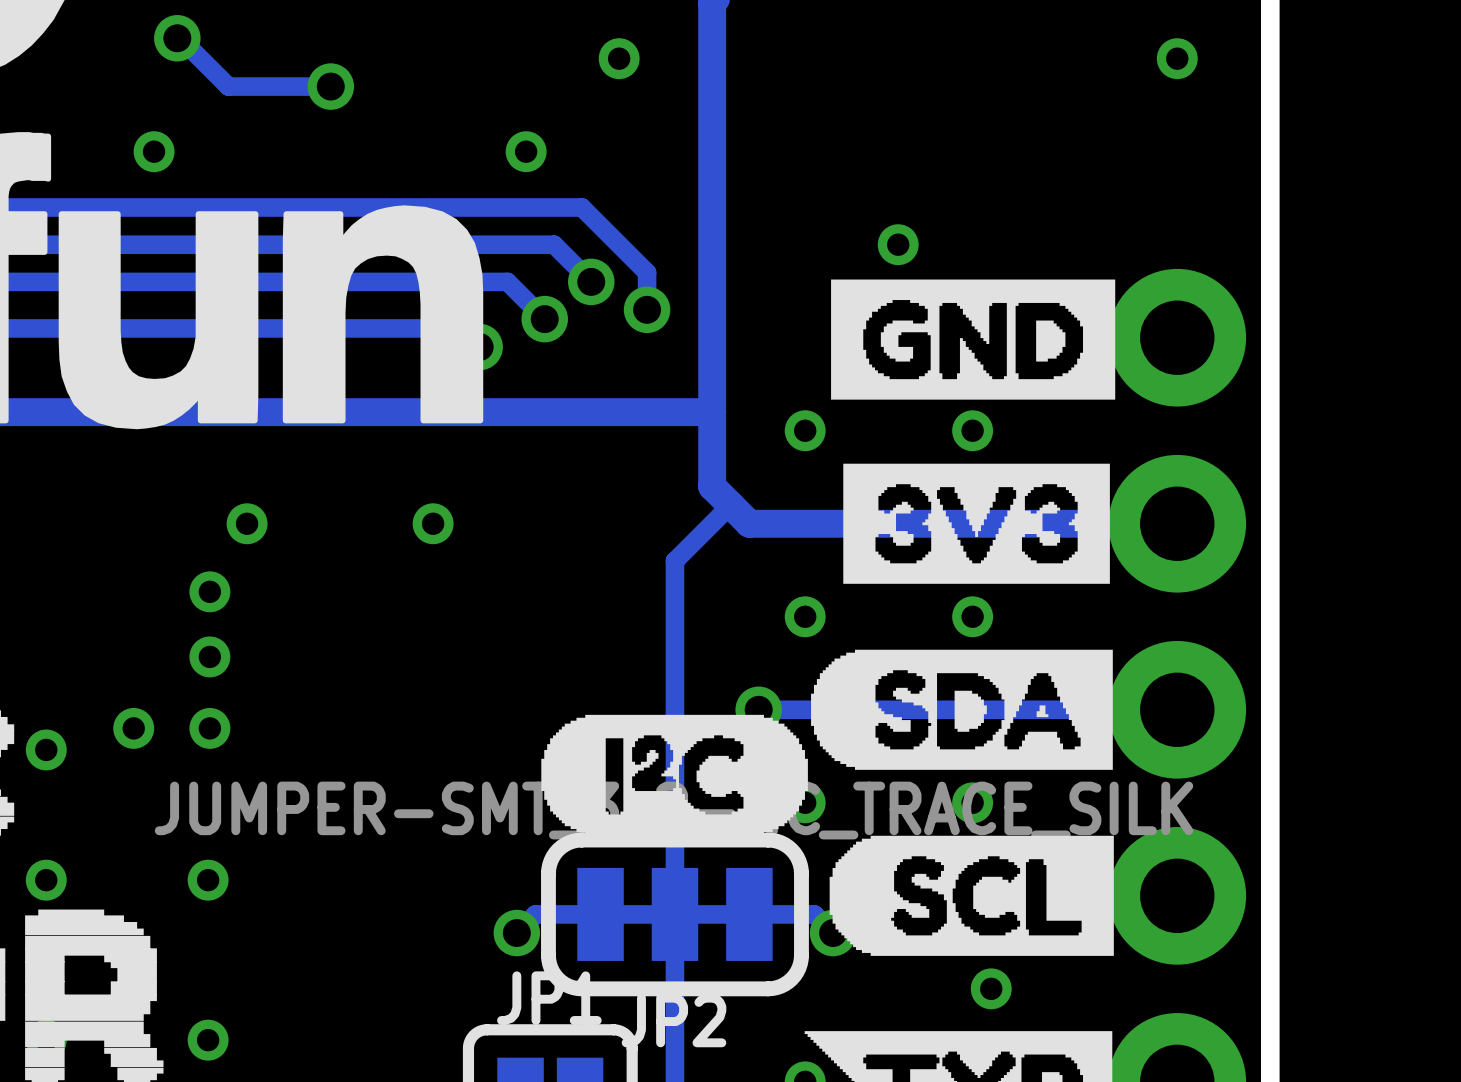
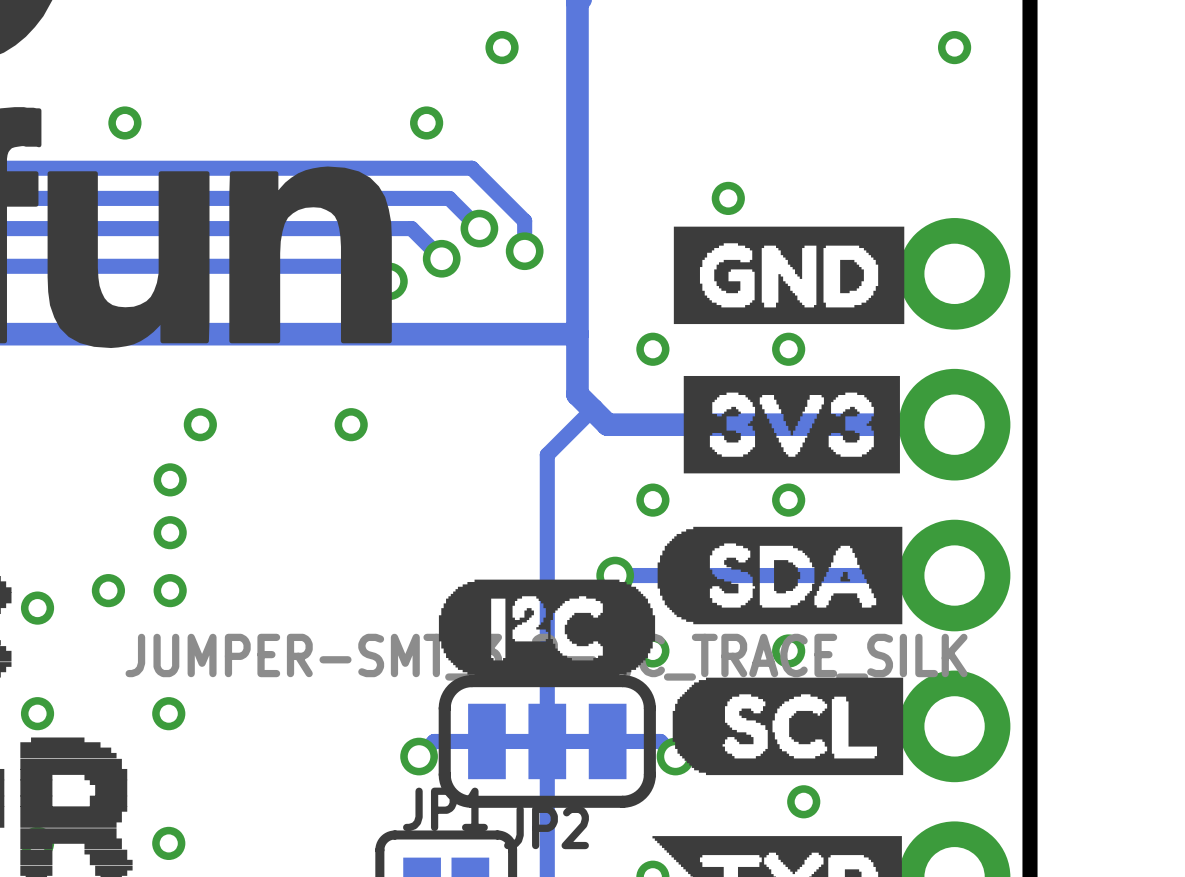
track: (177, 38) (180, 38) (228, 86) (330, 86) -> none
via: (177, 38) -> none
via: (330, 86) -> none

